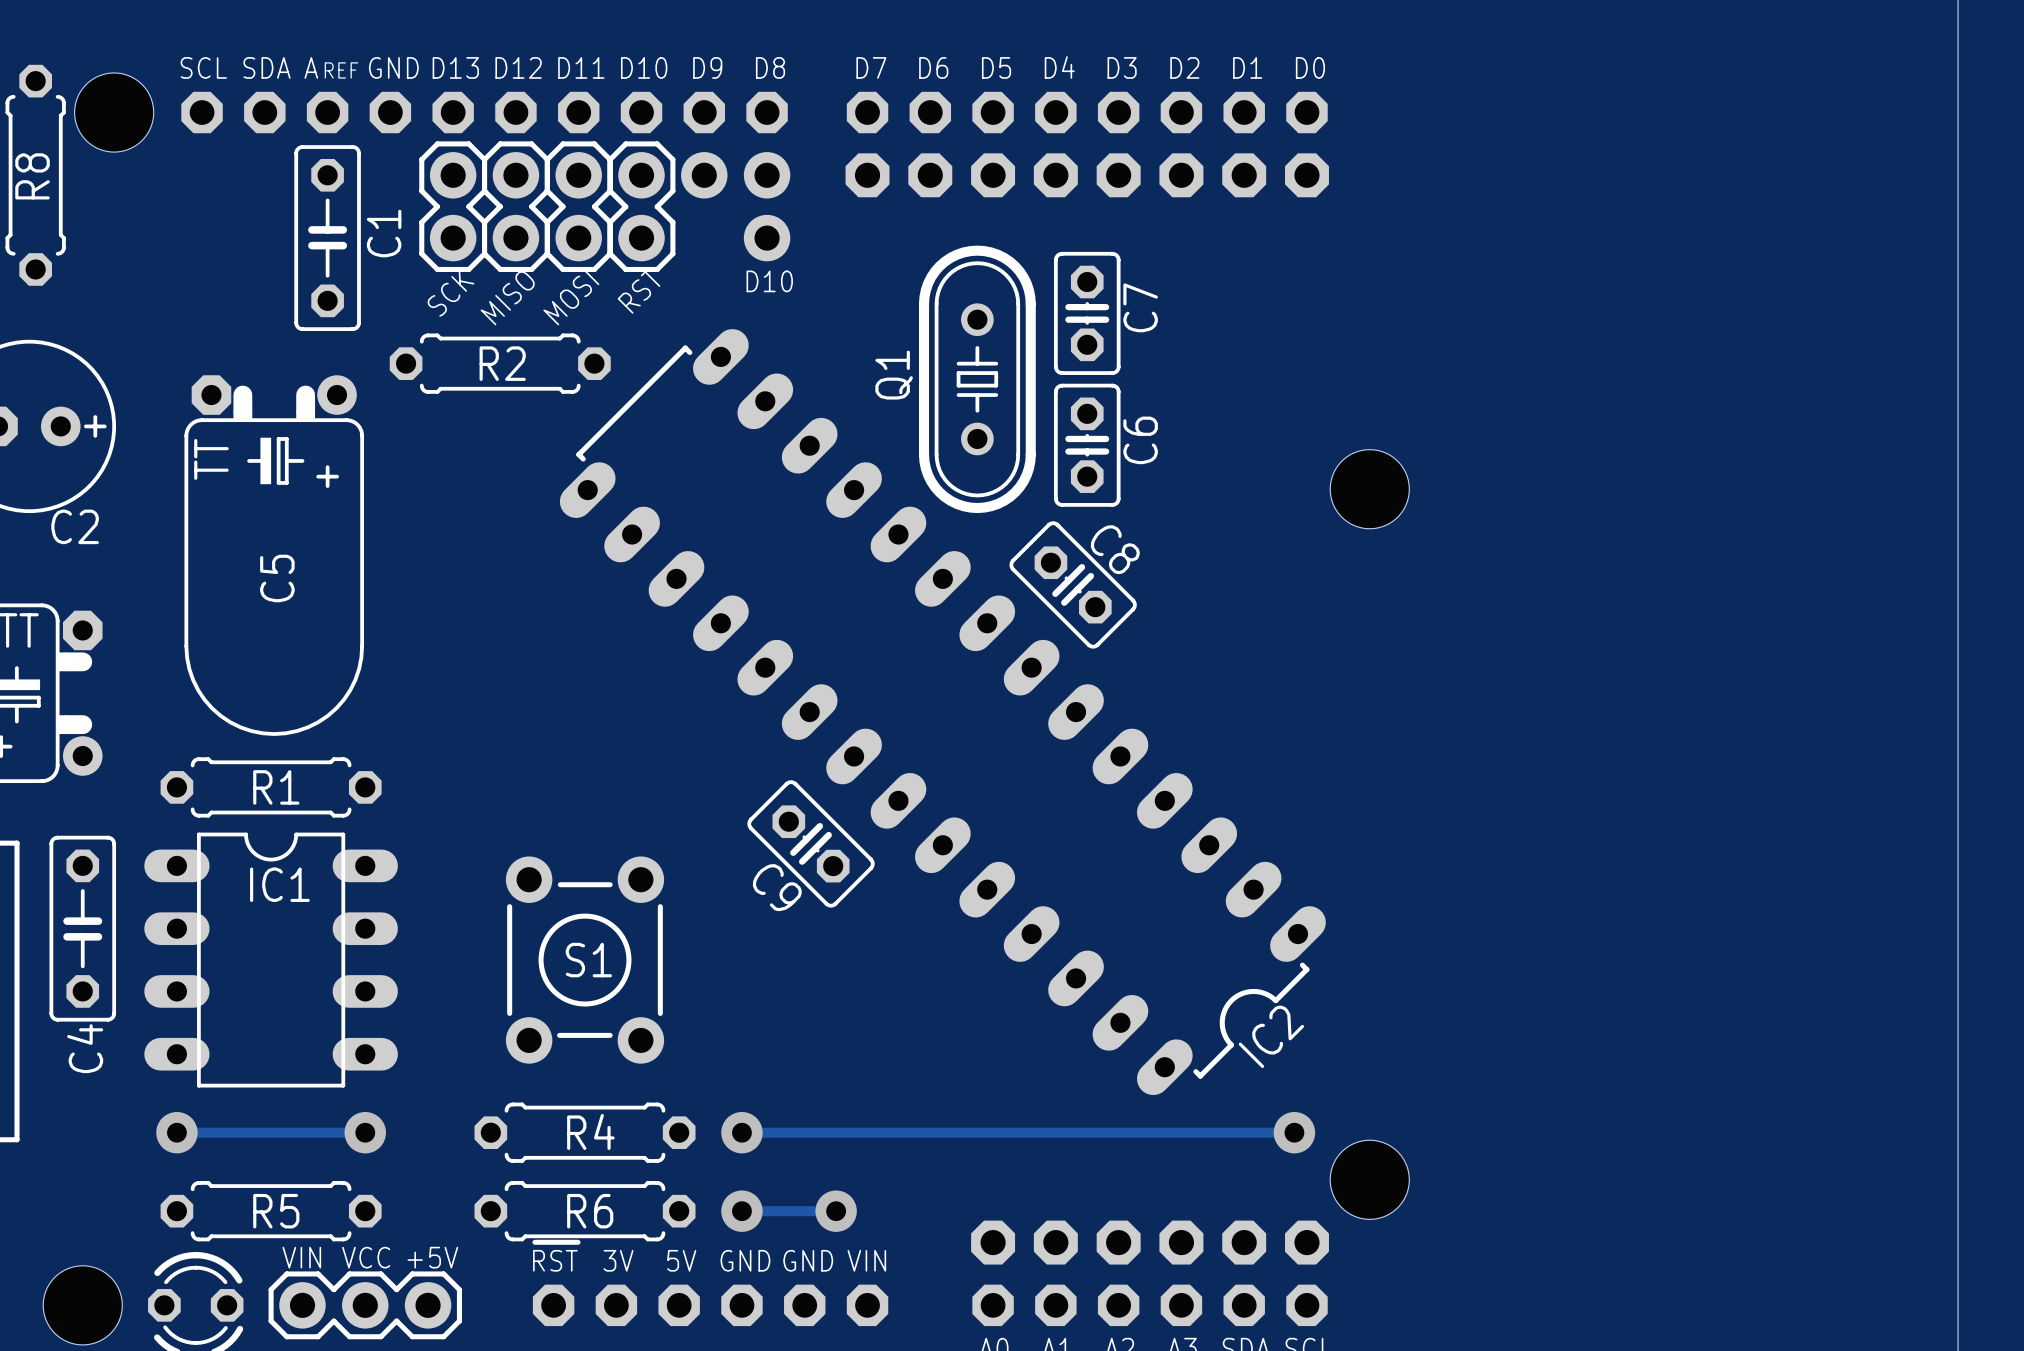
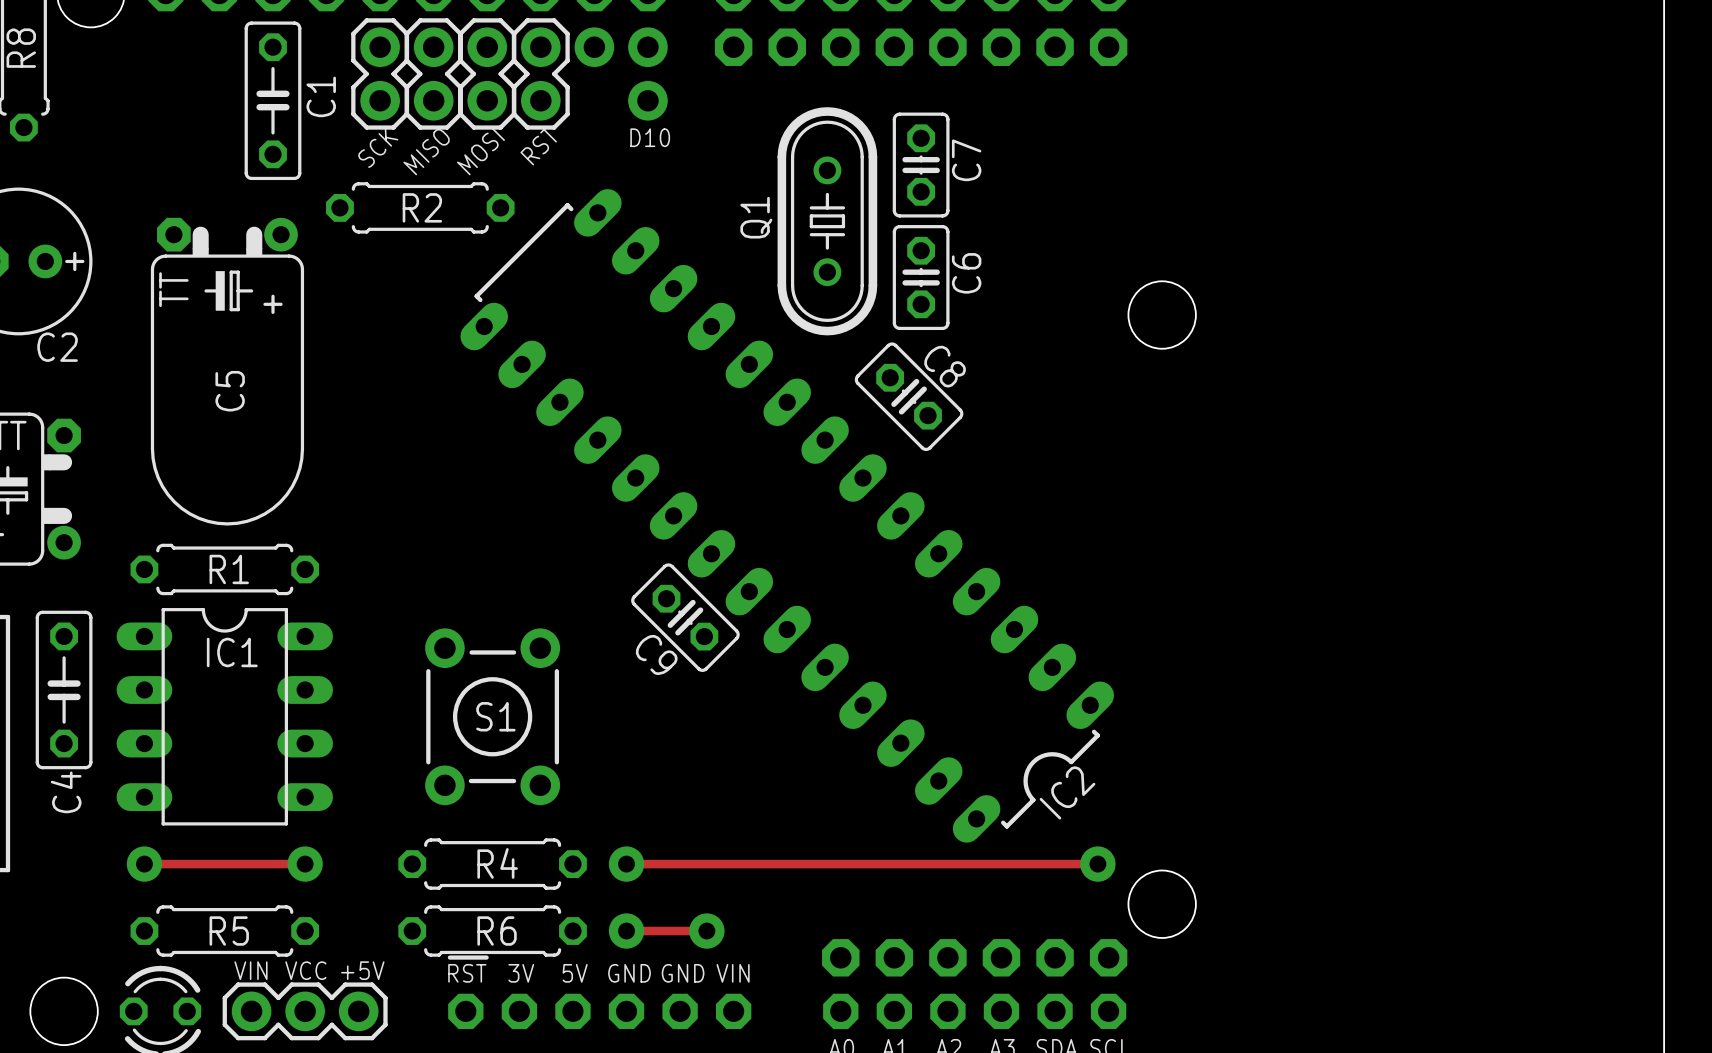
IC2 position: (942, 712) -> (787, 515)

